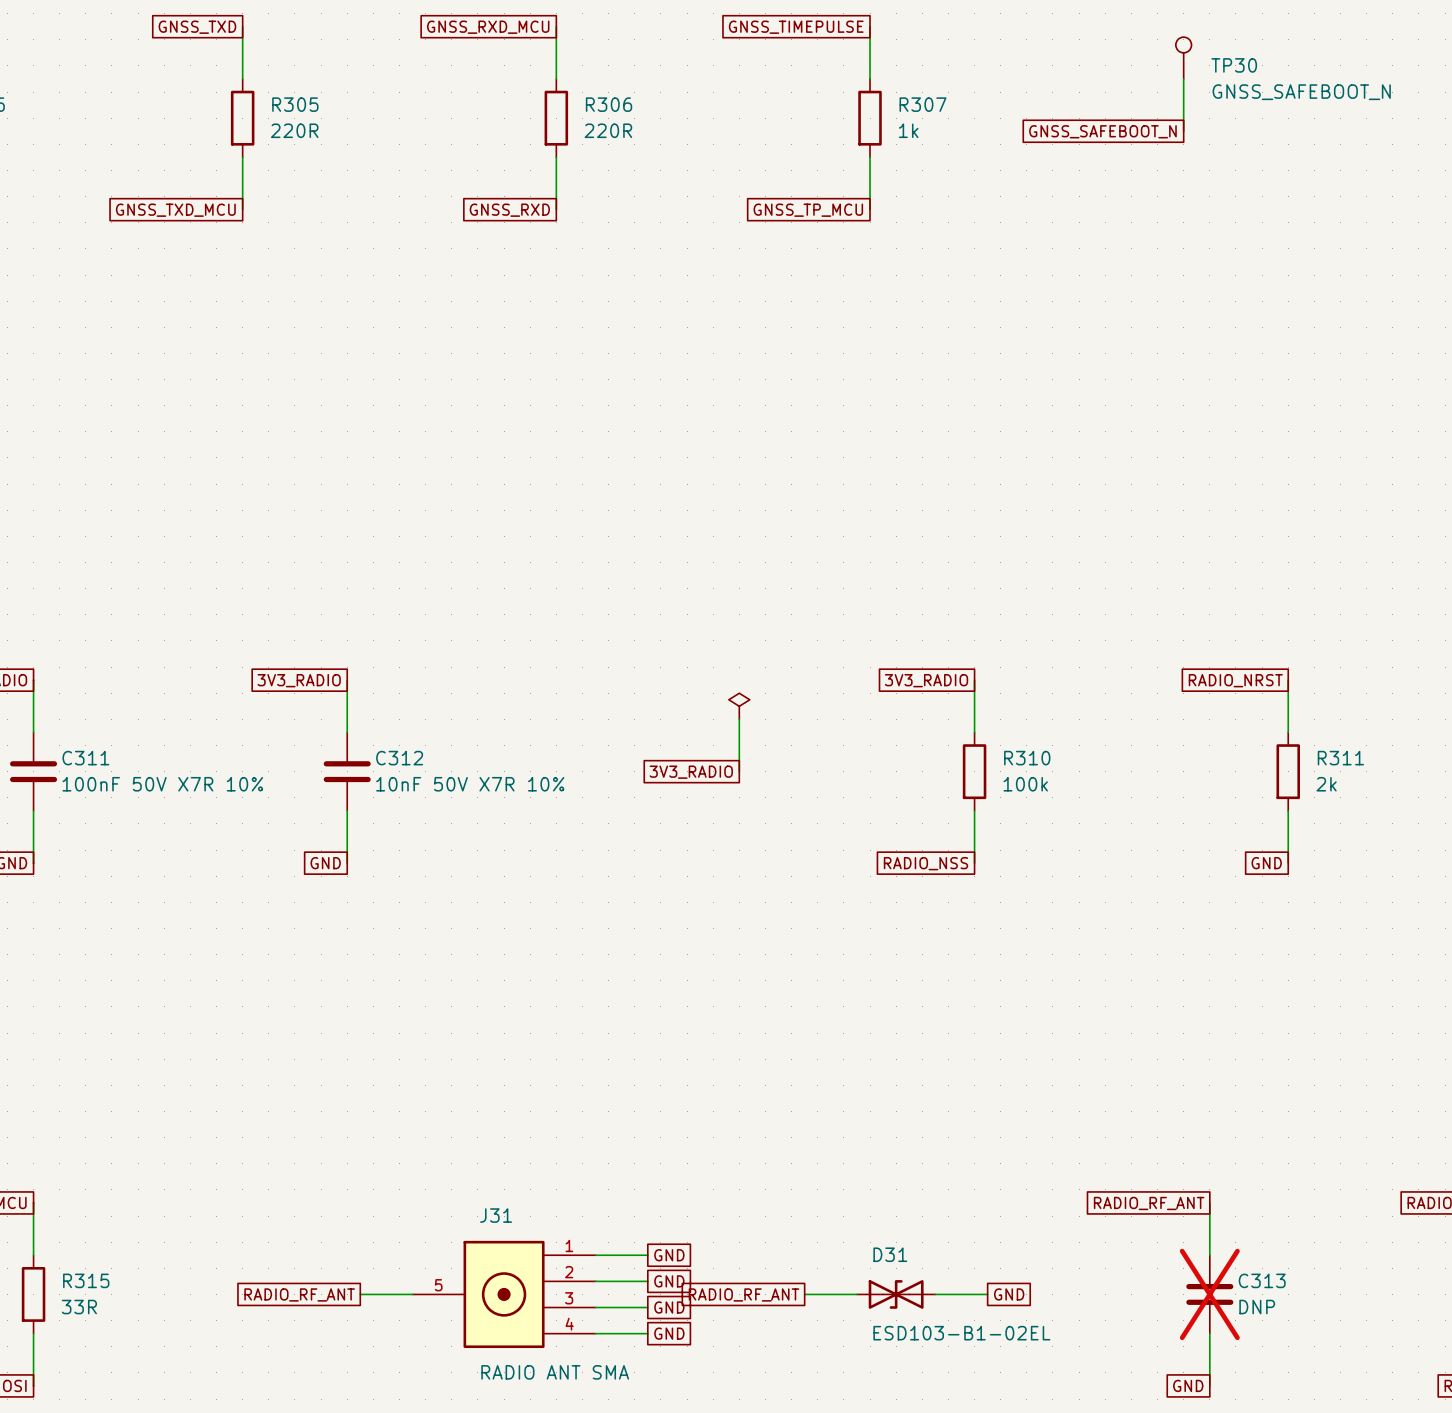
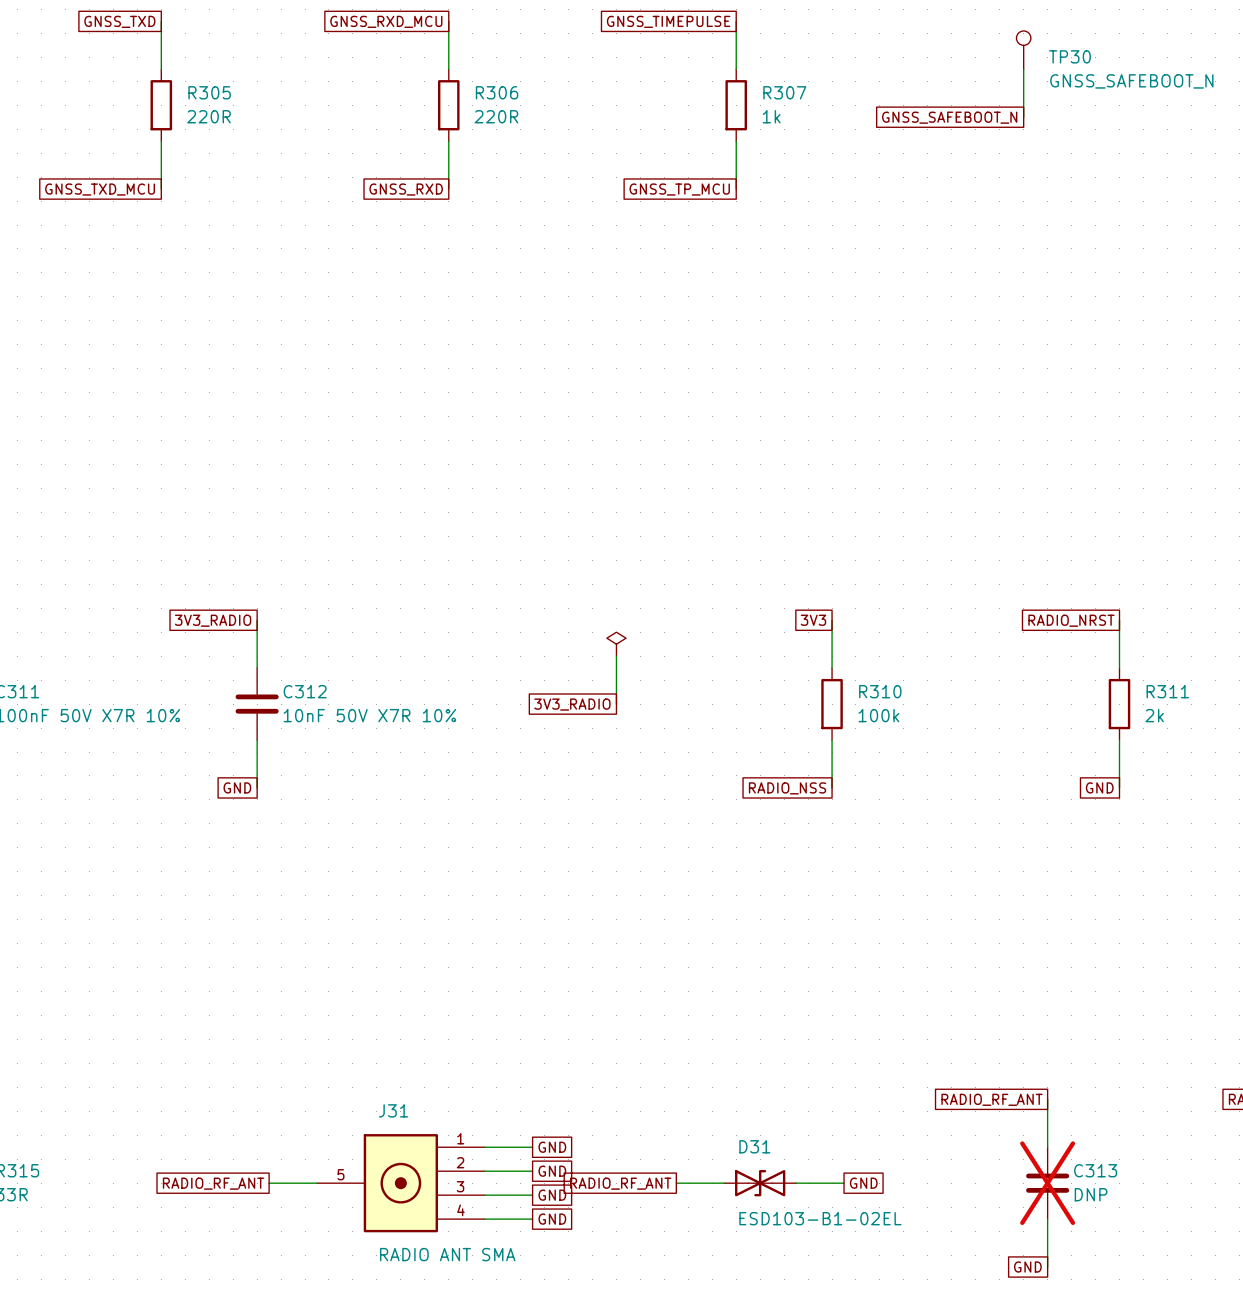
global label: 3V3_RADIO (926, 680) -> 3V3 (813, 620)

